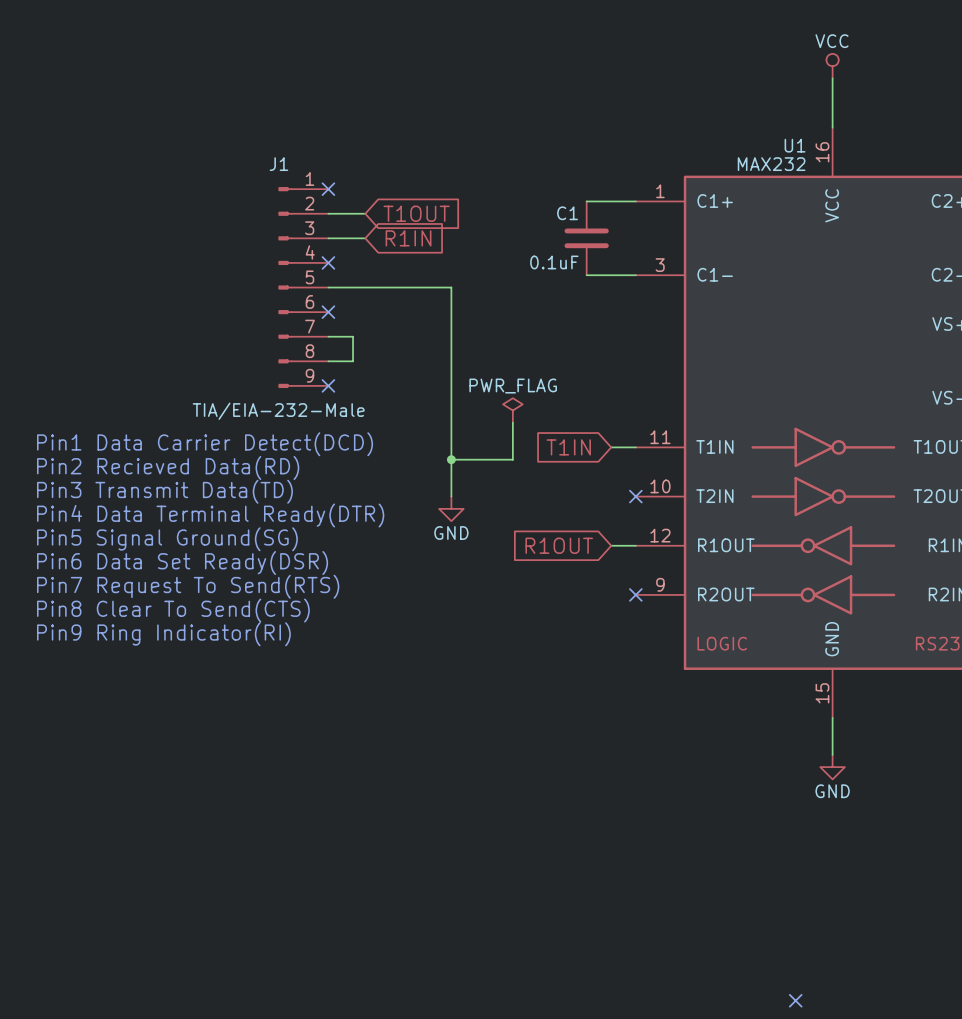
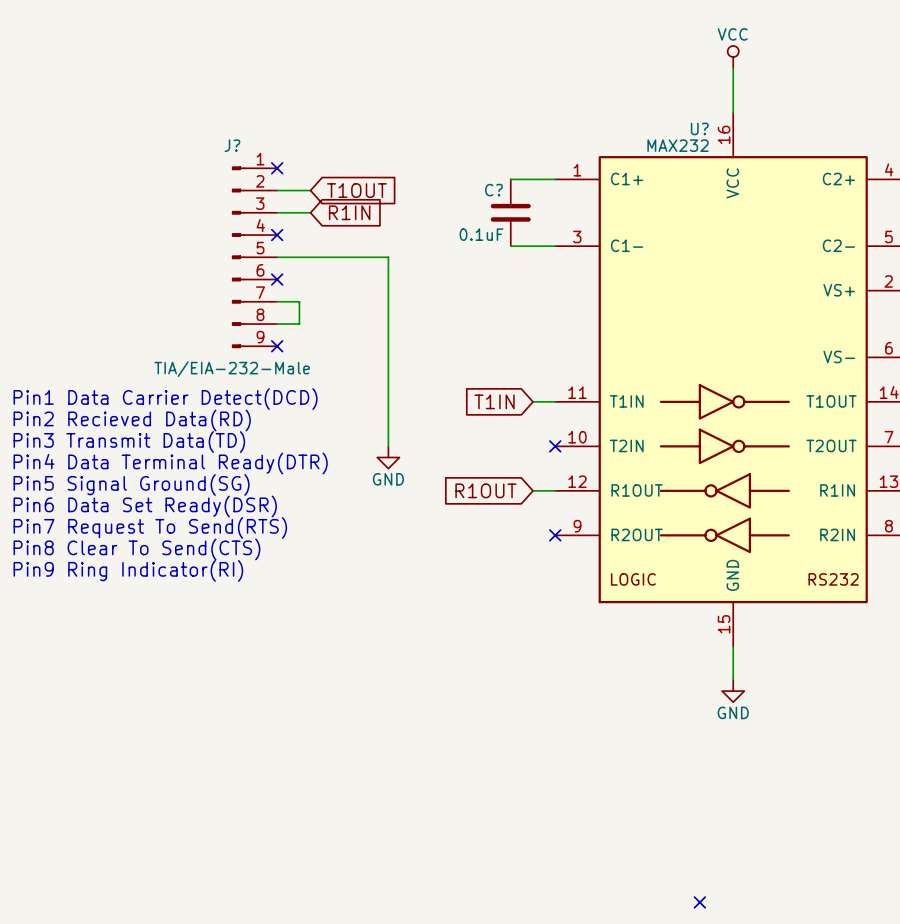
U1 name: U1 (795, 145) -> U? (699, 128)
J1 name: J1 (278, 164) -> J? (232, 145)
C1 name: C1 (567, 213) -> C? (494, 190)
power symbol: PWR_FLAG (512, 410) -> none
wire: (512, 422) (512, 459) (451, 459) -> none
junction: (451, 459) -> none

